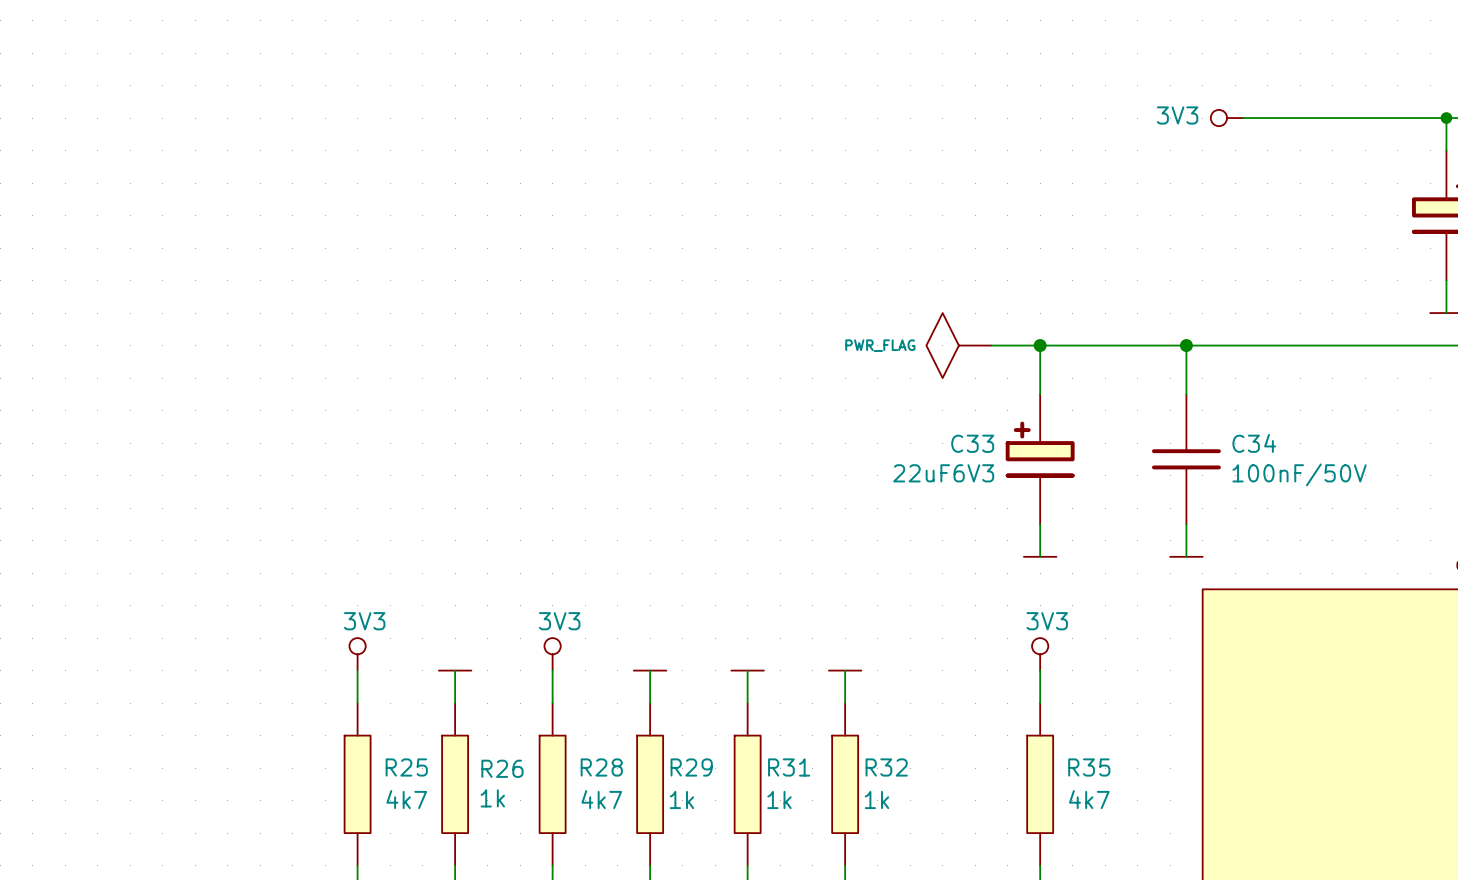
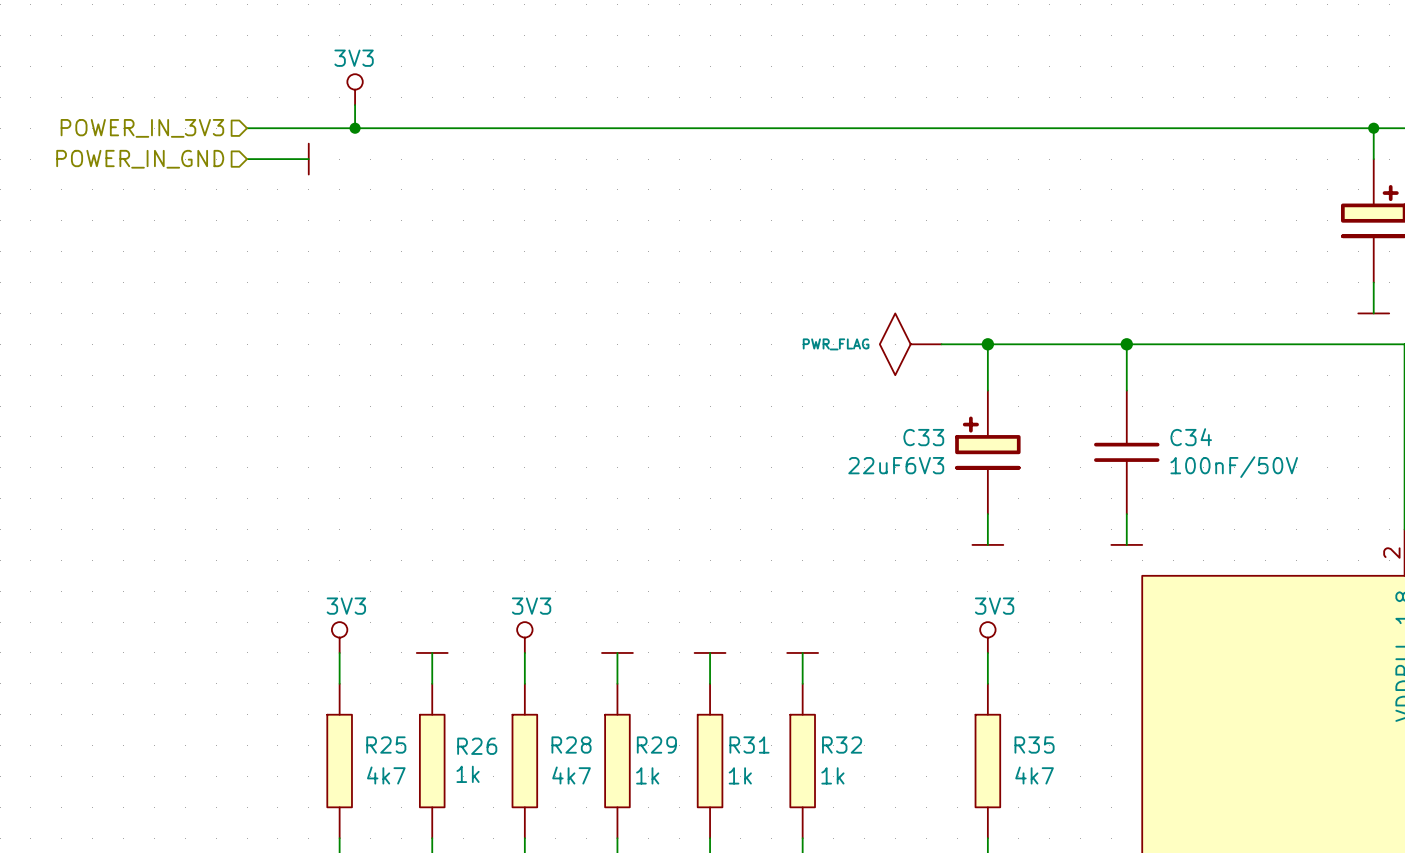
power symbol: none -> 3V3 (355, 89)
wire: none -> (355, 105) (355, 128)
hierarchical label: none -> POWER_IN_3V3 (142, 128)
wire: none -> (247, 128) (1180, 128)
junction: none -> (355, 128)
power symbol: 3V3 (1227, 118) -> none
hierarchical label: none -> POWER_IN_GND (140, 159)
wire: none -> (247, 159) (308, 159)
power symbol: none -> (308, 159)

